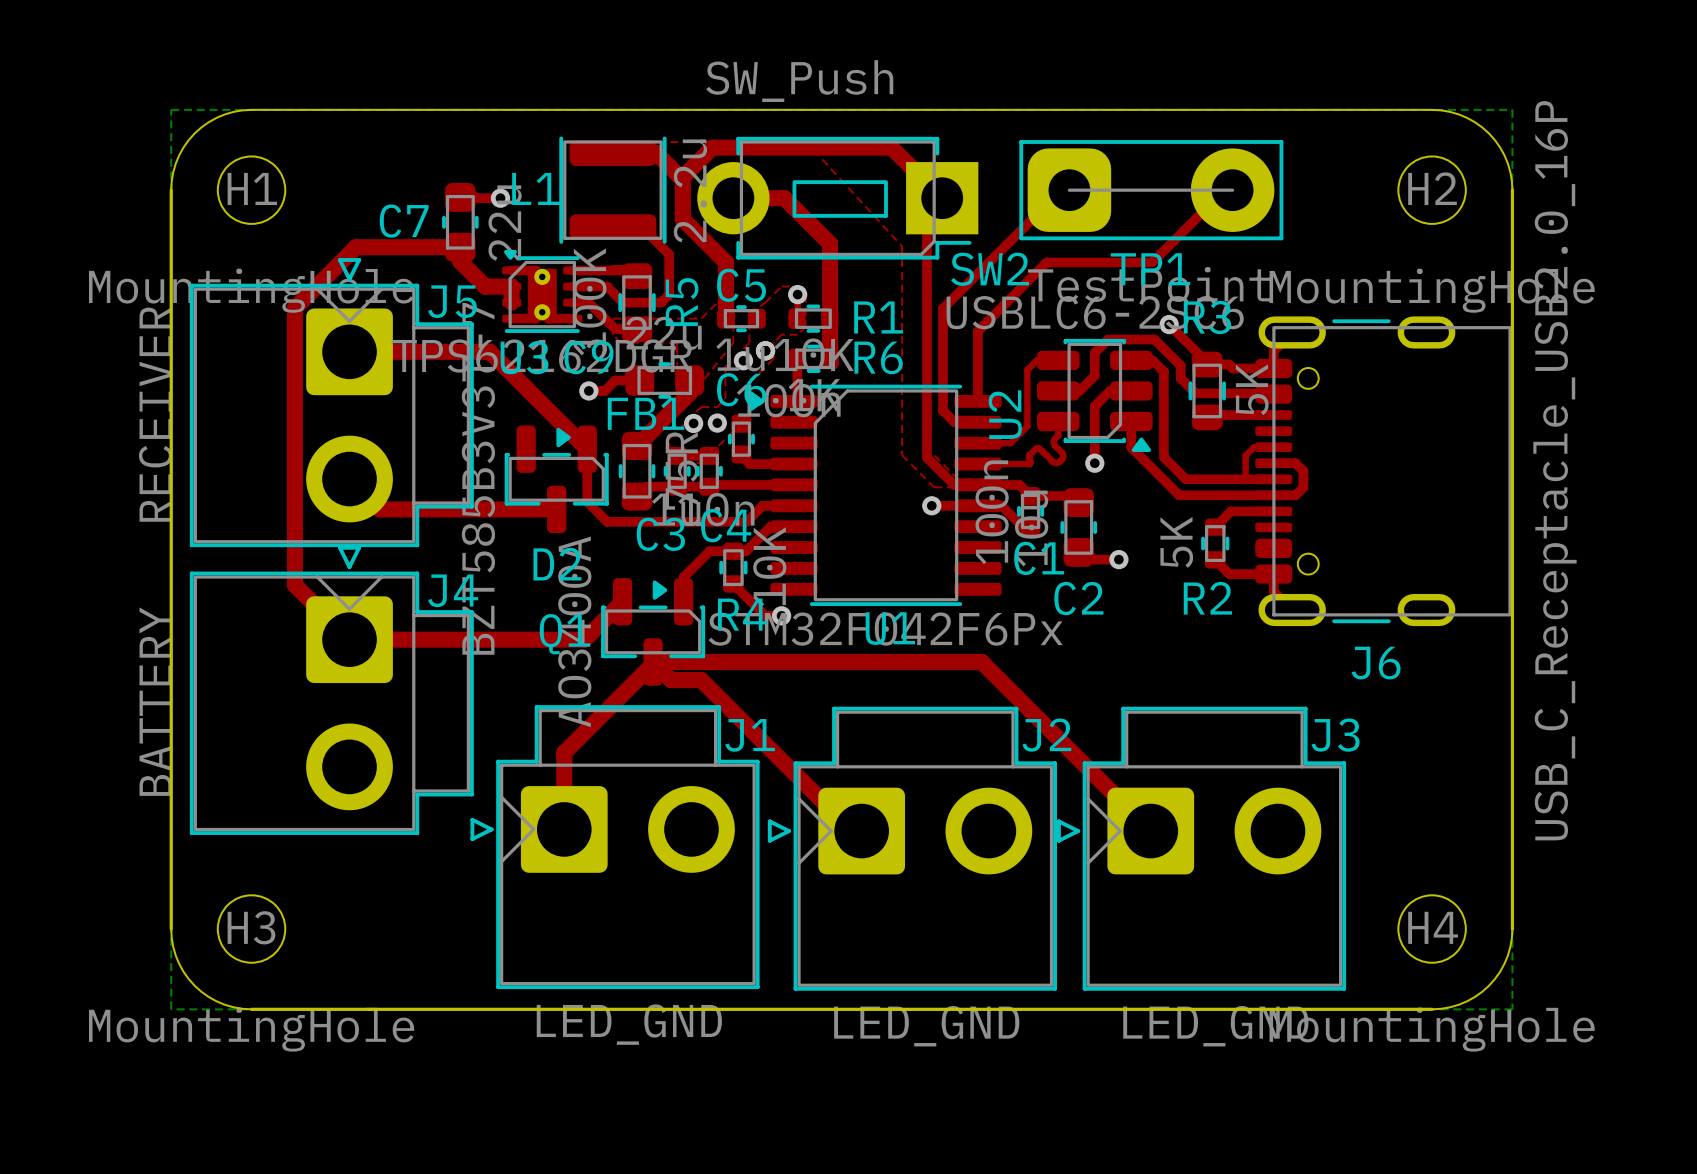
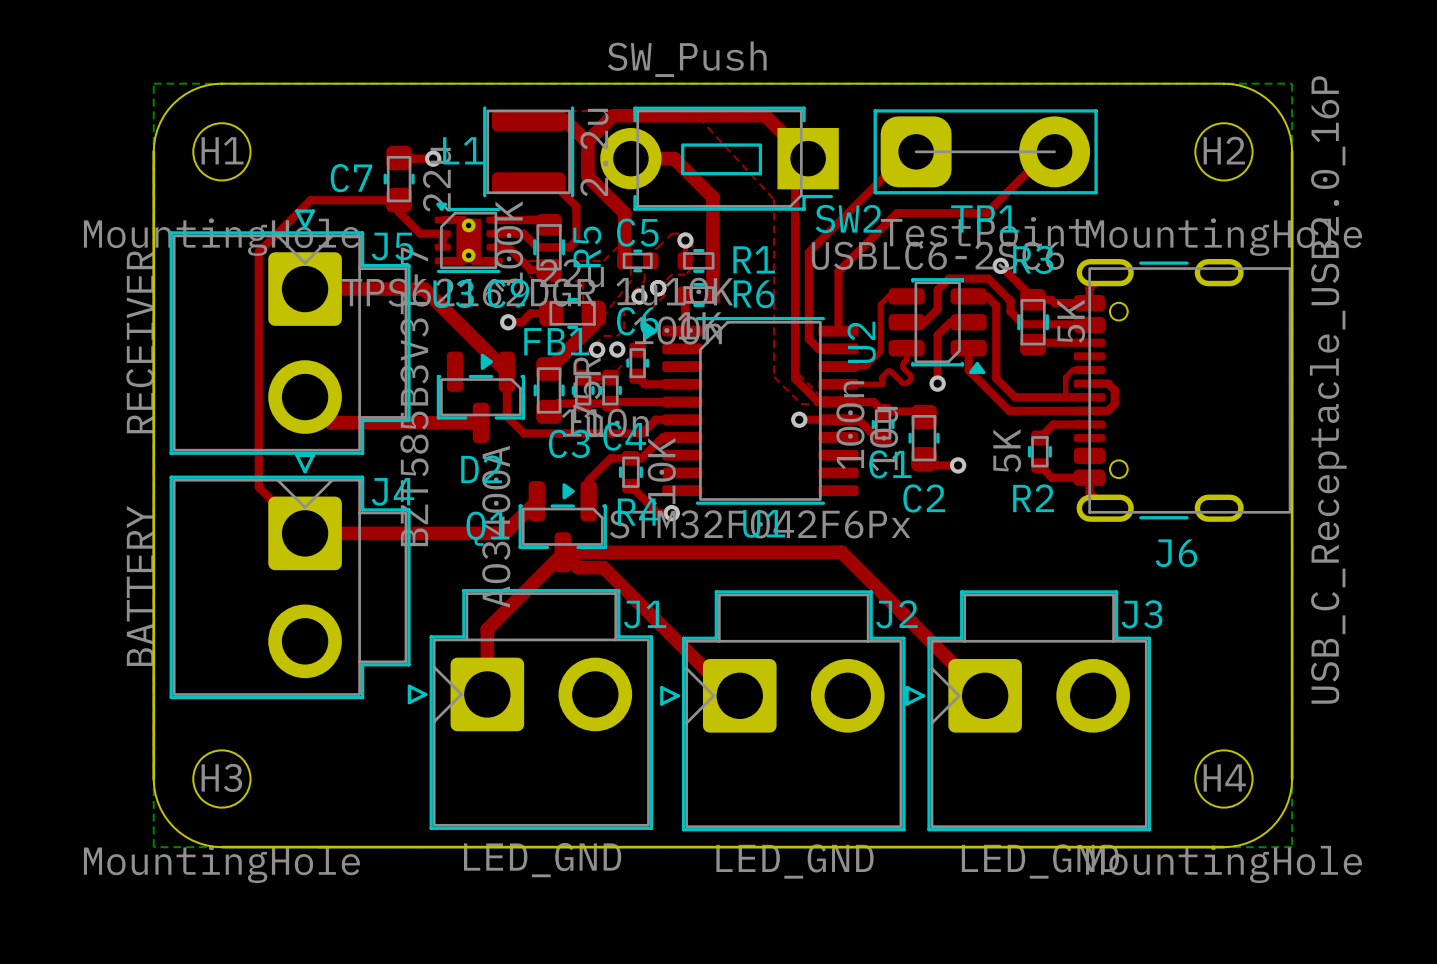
top track width: thick (511, 302) (511, 286) (485, 286) (460, 261) (460, 247) (356, 247) (294, 308) (294, 585) (349, 639) -> thin (442, 247) (442, 233) (420, 233) (399, 212) (399, 200) (310, 200) (258, 252) (258, 487) (305, 533)

